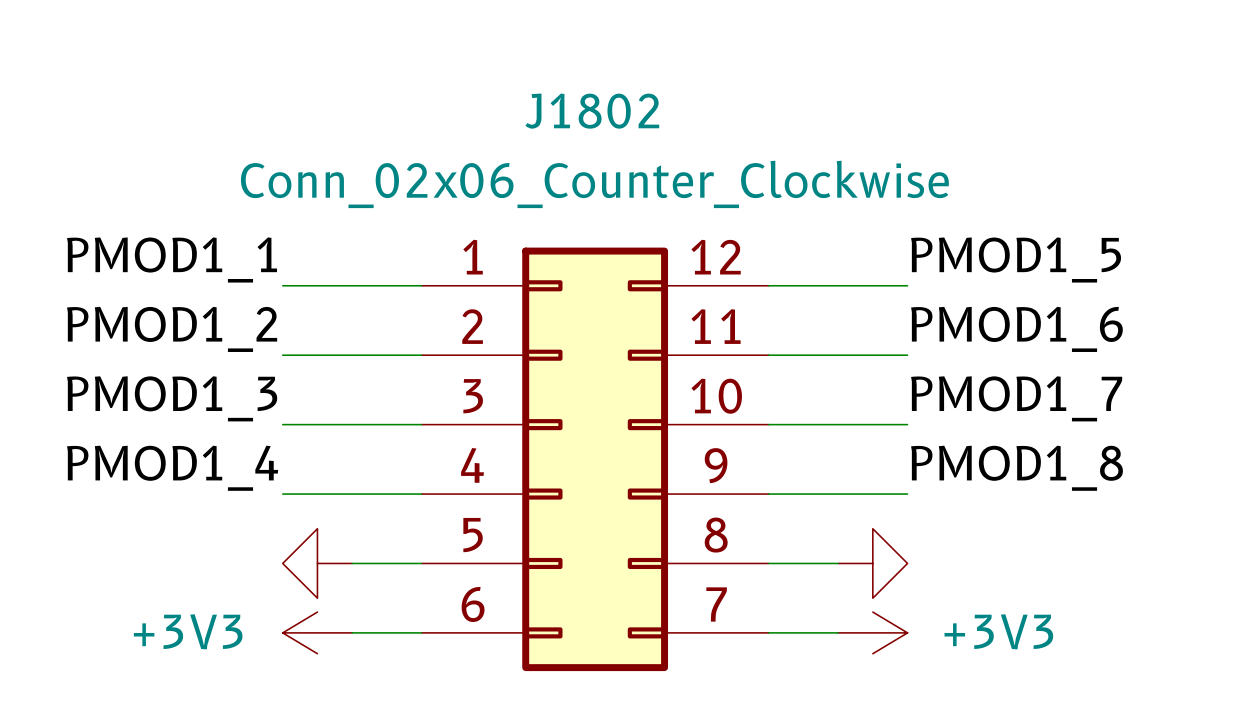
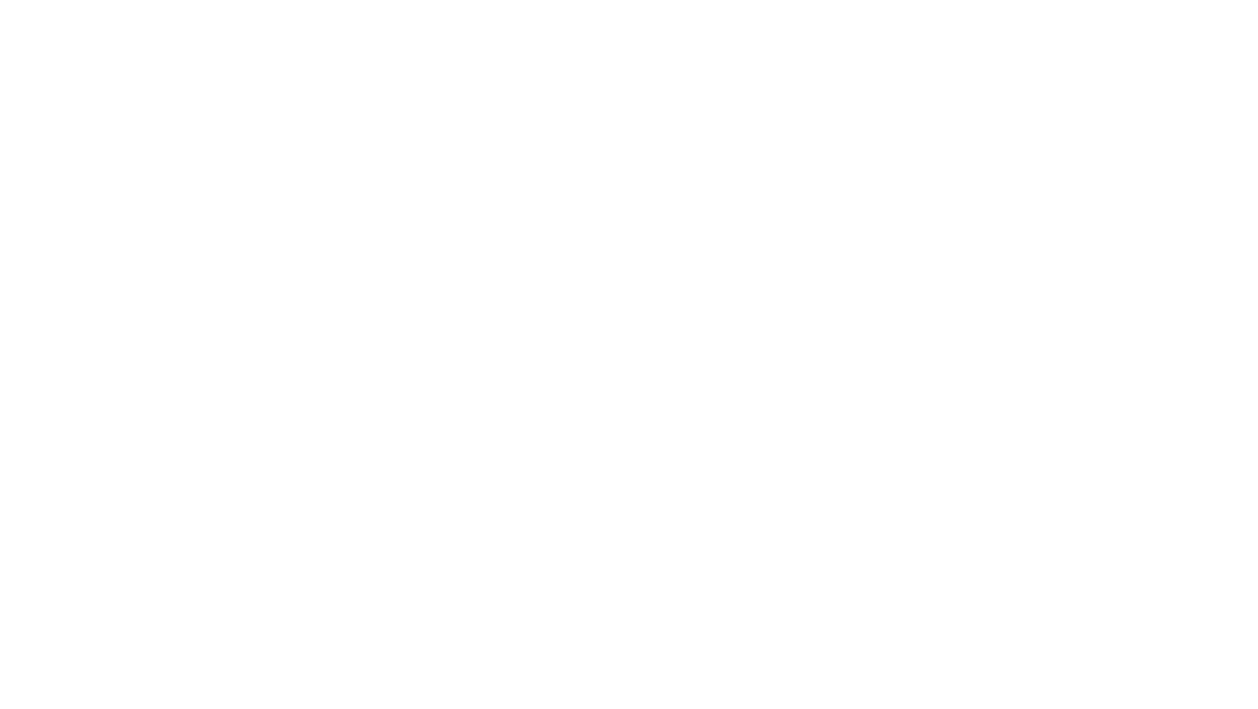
label: PMOD1_1 (172, 260) -> none
label: PMOD1_5 (1016, 260) -> none
wire: (282, 285) (421, 285) -> none
wire: (768, 285) (907, 285) -> none
label: PMOD1_2 (172, 329) -> none
label: PMOD1_6 (1016, 329) -> none
wire: (282, 355) (421, 355) -> none
wire: (768, 355) (907, 355) -> none
label: PMOD1_3 (172, 398) -> none
label: PMOD1_7 (1016, 398) -> none
wire: (282, 424) (421, 424) -> none
wire: (768, 424) (907, 424) -> none
J1802: Conn_02x06_Counter_Clockwise (595, 459) -> none
label: PMOD1_4 (172, 468) -> none
label: PMOD1_8 (1017, 468) -> none
wire: (282, 494) (421, 494) -> none
wire: (768, 494) (907, 494) -> none
power symbol: (317, 563) -> none
wire: (352, 563) (421, 563) -> none
wire: (768, 563) (838, 563) -> none
power symbol: (872, 563) -> none
power symbol: +3V3 (317, 632) -> none
wire: (352, 632) (421, 632) -> none
wire: (768, 632) (838, 632) -> none
power symbol: +3V3 (872, 632) -> none

